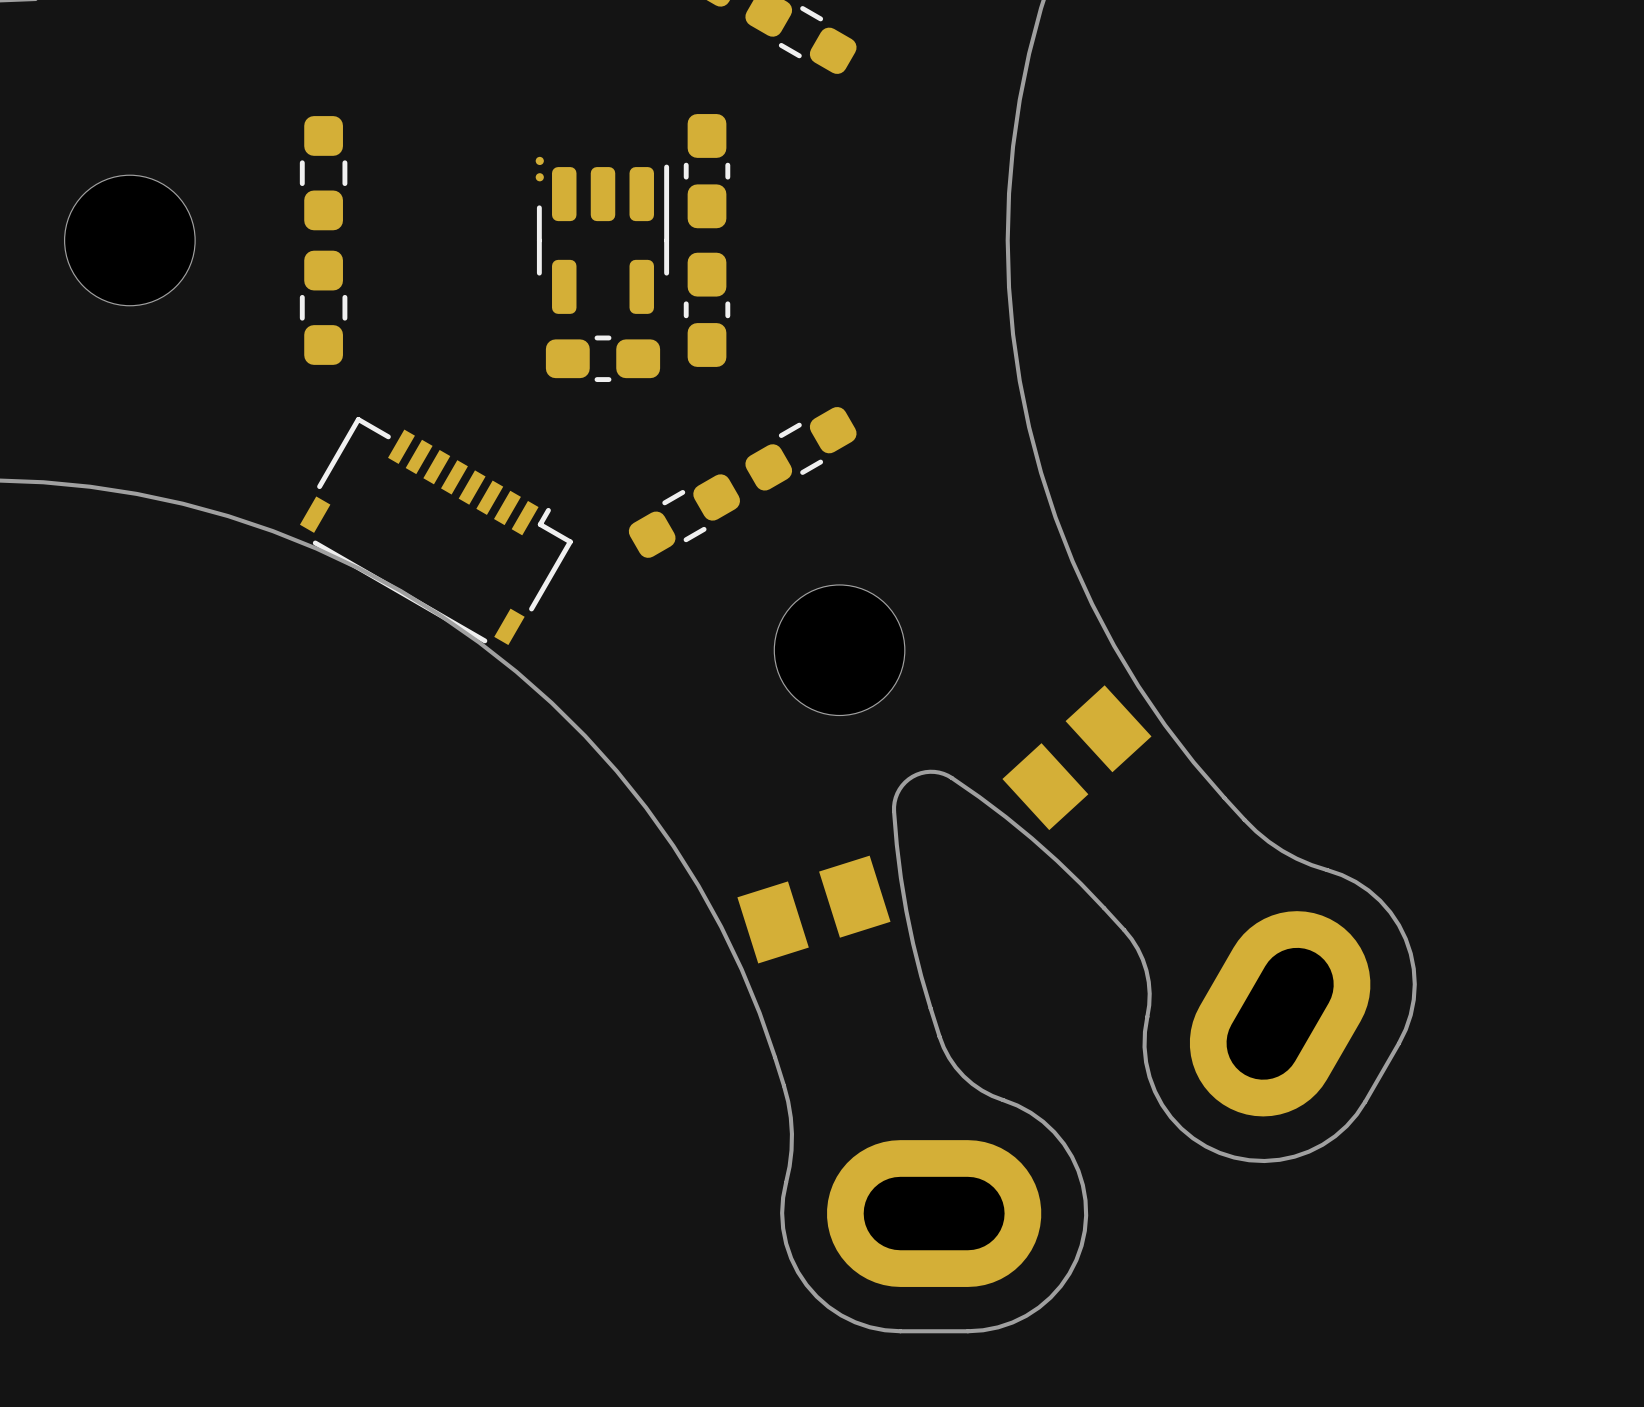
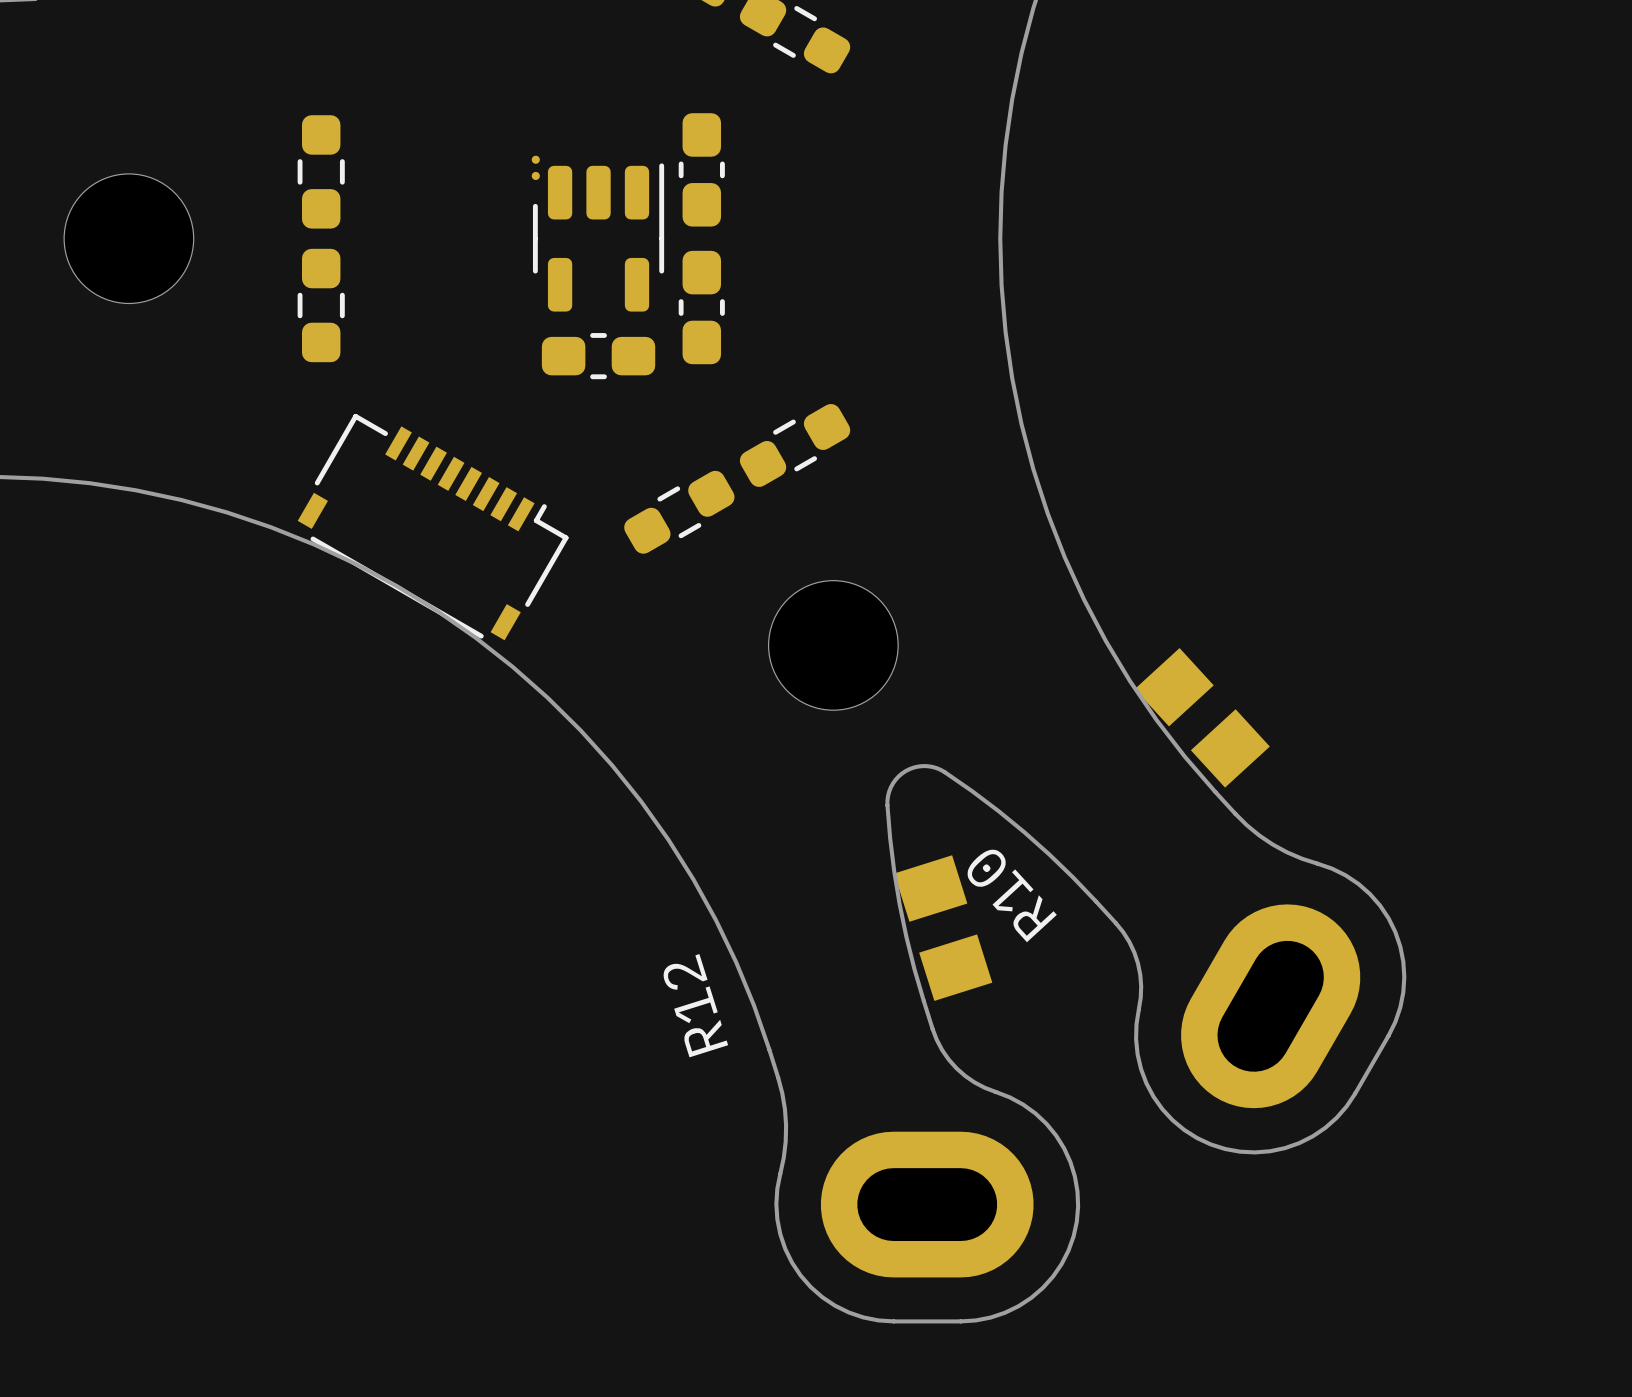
R10: none -> (1202, 717)
part: (1076, 757) -> none
part: (813, 909) -> none
R12: none -> (943, 928)

